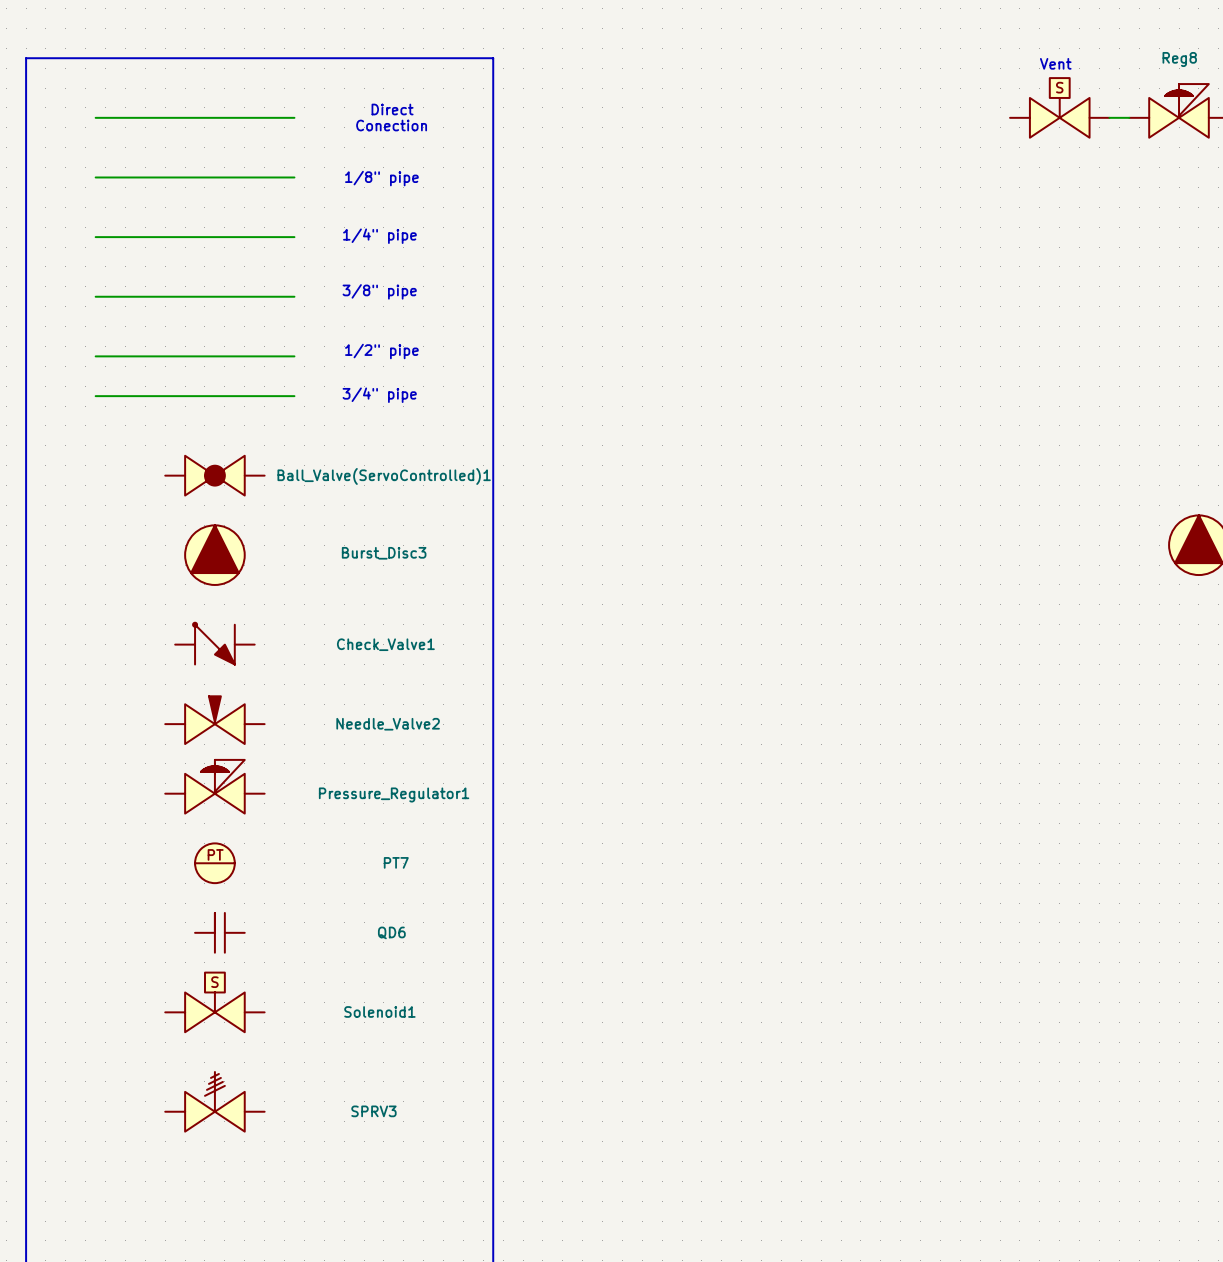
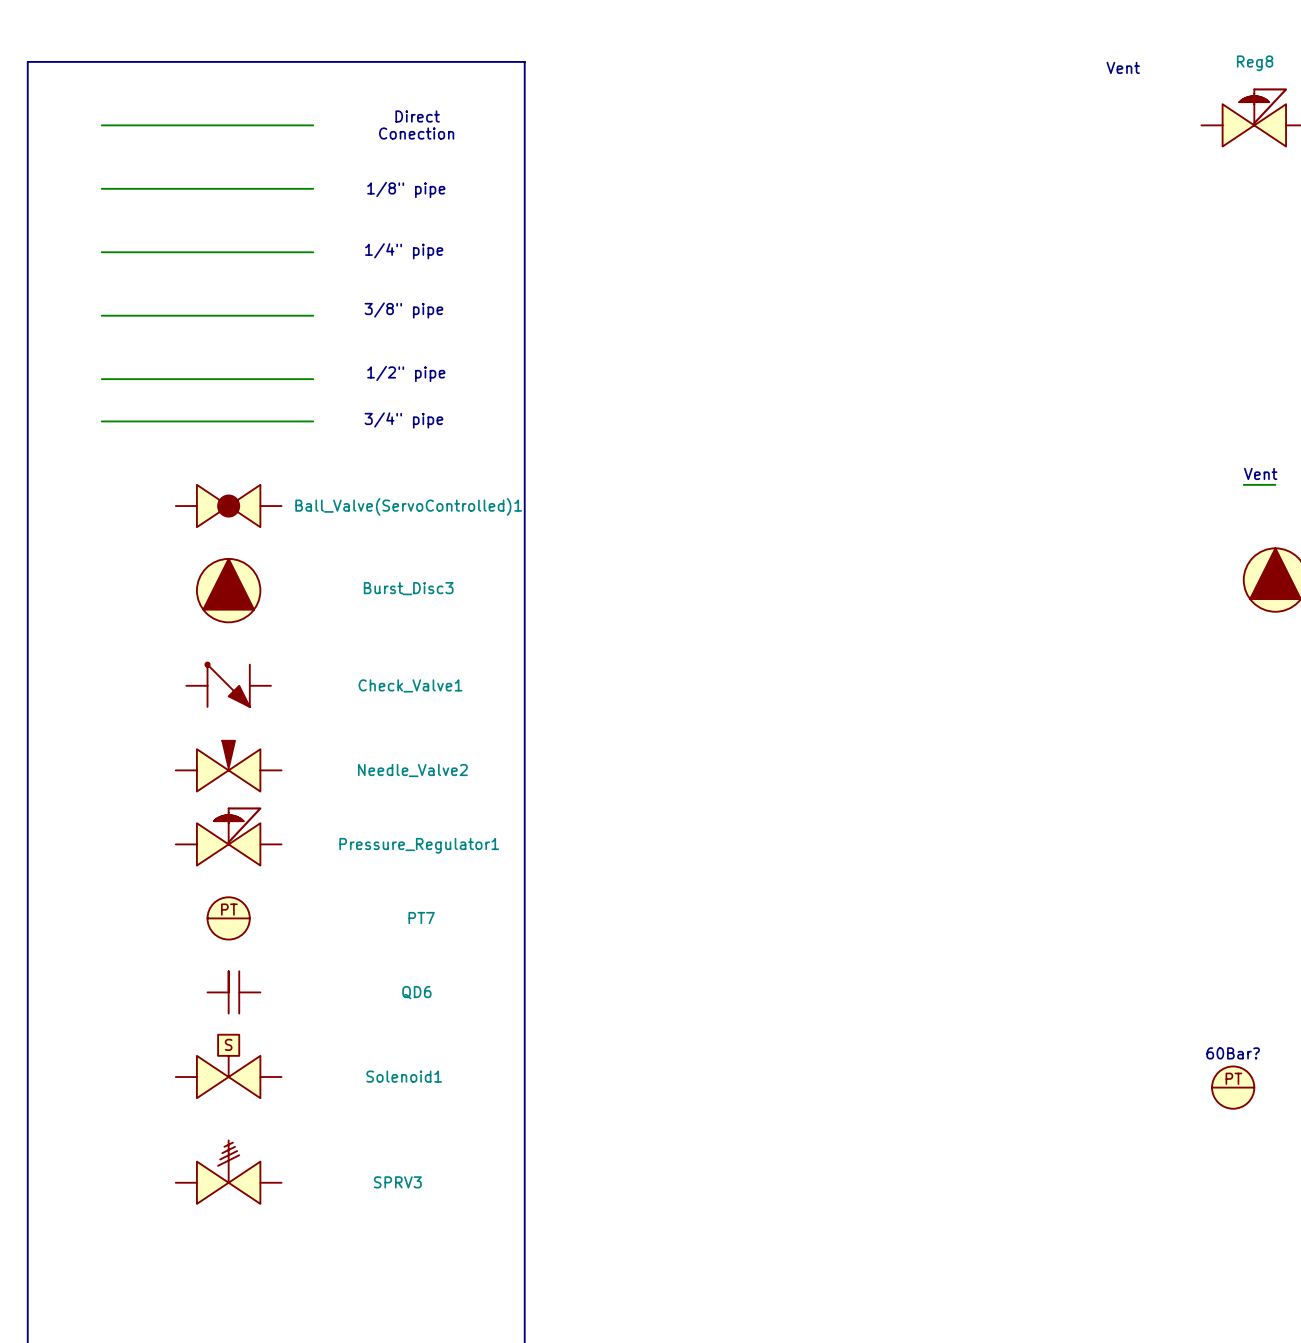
part: (1059, 107) -> none
wire: (1109, 117) (1129, 117) -> none
text: none -> Vent (1260, 473)
wire: none -> (1243, 484) (1275, 484)
text: none -> 60Bar? (1233, 1053)
part: none -> (1233, 1087)

